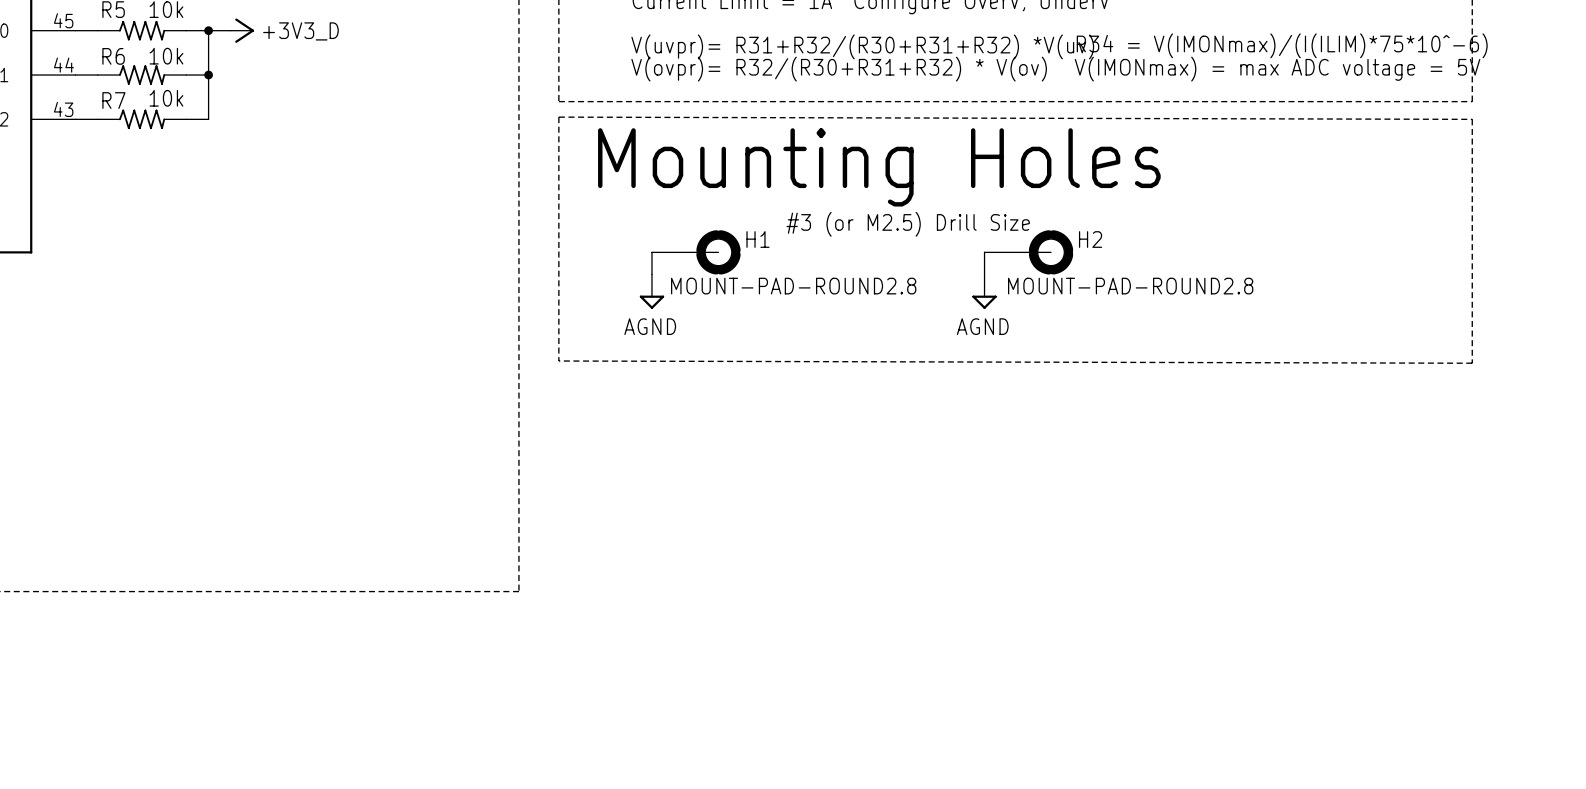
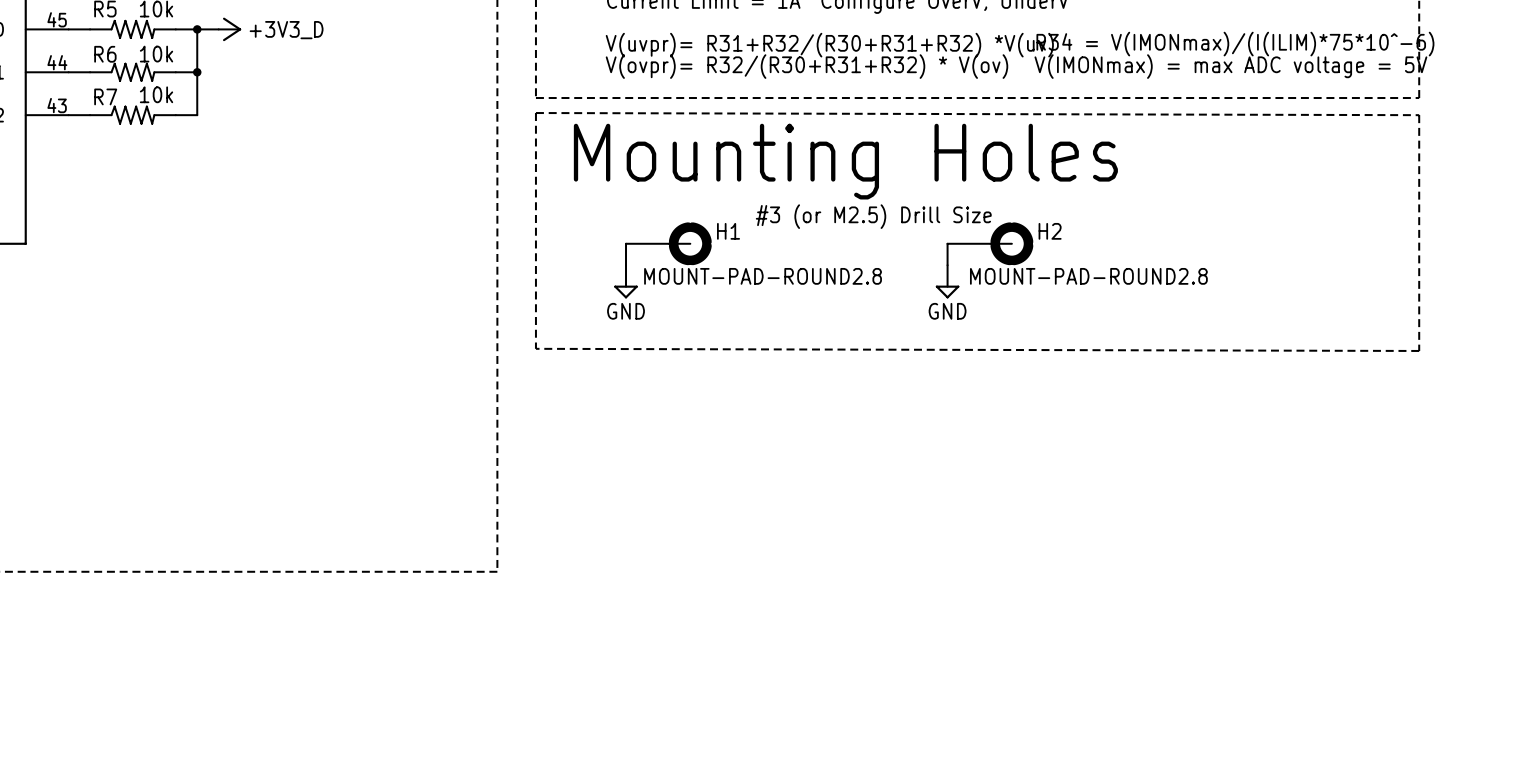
power symbol: AGND (651, 291) -> GND (626, 281)
power symbol: AGND (984, 291) -> GND (947, 281)

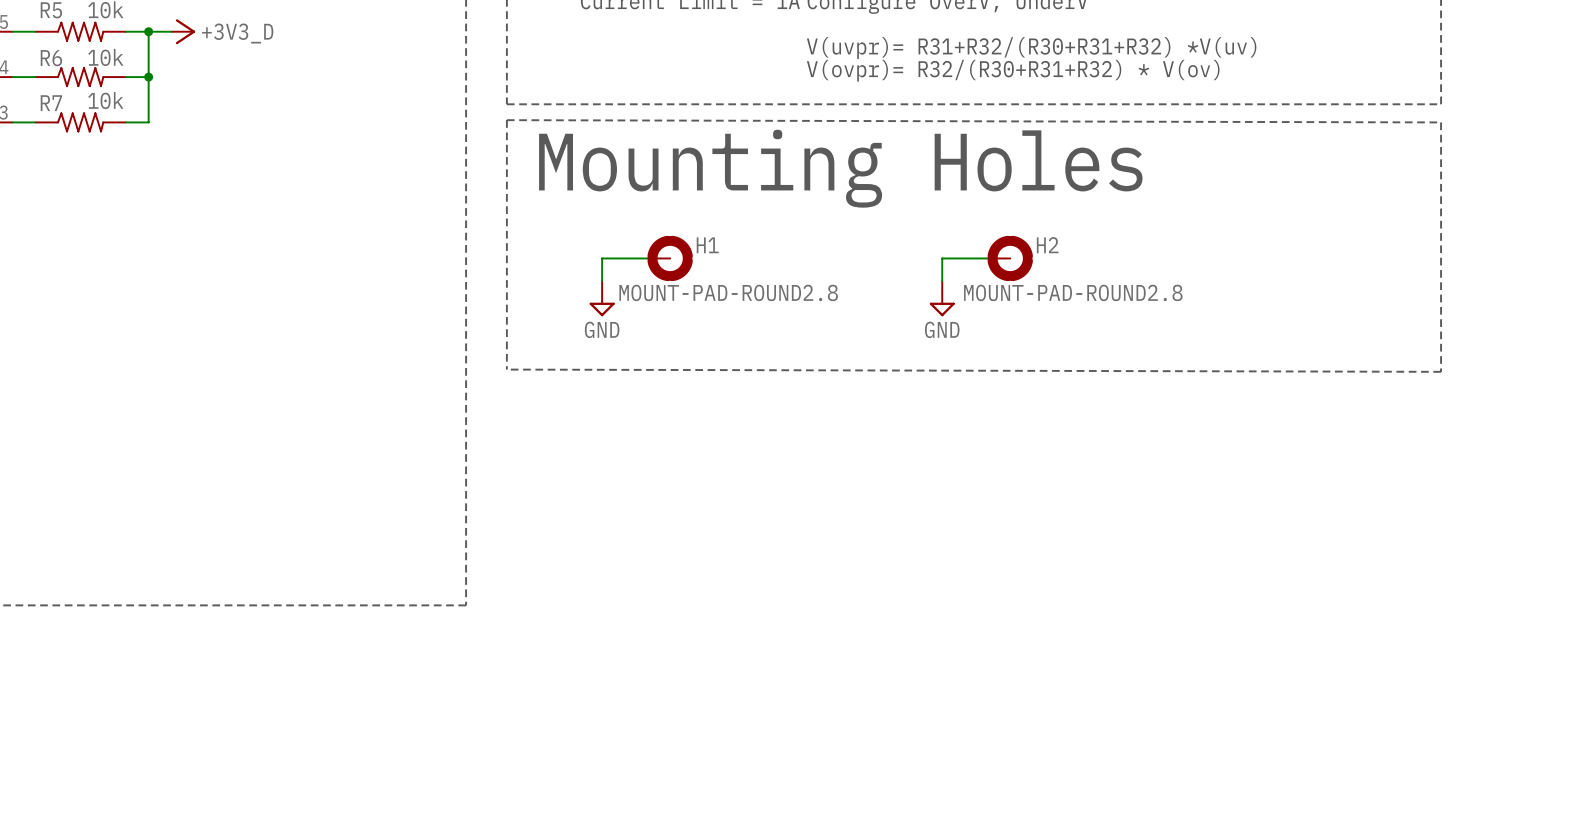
text: R34 = V(IMONmax)/(I(ILIM)*75*10^-6) (1235, 44) -> none
text: V(uvpr)= R31+R32/(R30+R31+R32) *V(uv) (829, 45) -> none
text: none -> V(uvpr)= R31+R32/(R30+R31+R32) *V(uv) (1031, 48)
text: V(ovpr)= R32/(R30+R31+R32) * V(ov) (806, 66) -> none
text: none -> V(ovpr)= R32/(R30+R31+R32) * V(ov) (1013, 70)
text: V(IMONmax) = max ADC voltage = 5V (1230, 66) -> none
text: #3 (or M2.5) Drill Size (873, 216) -> none

